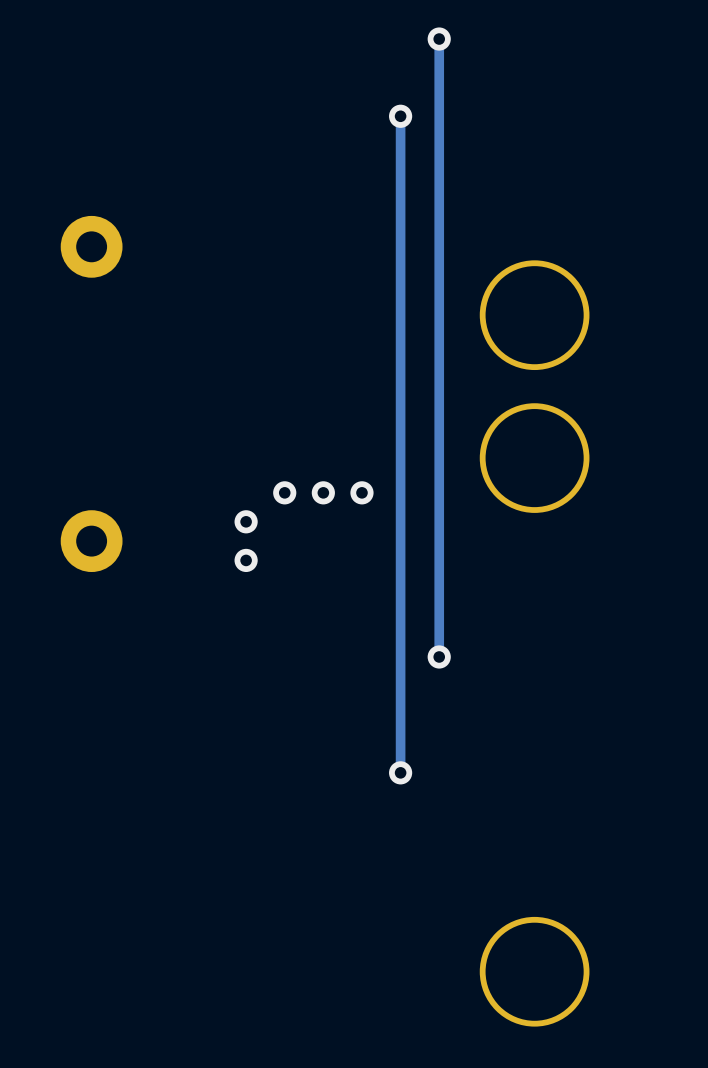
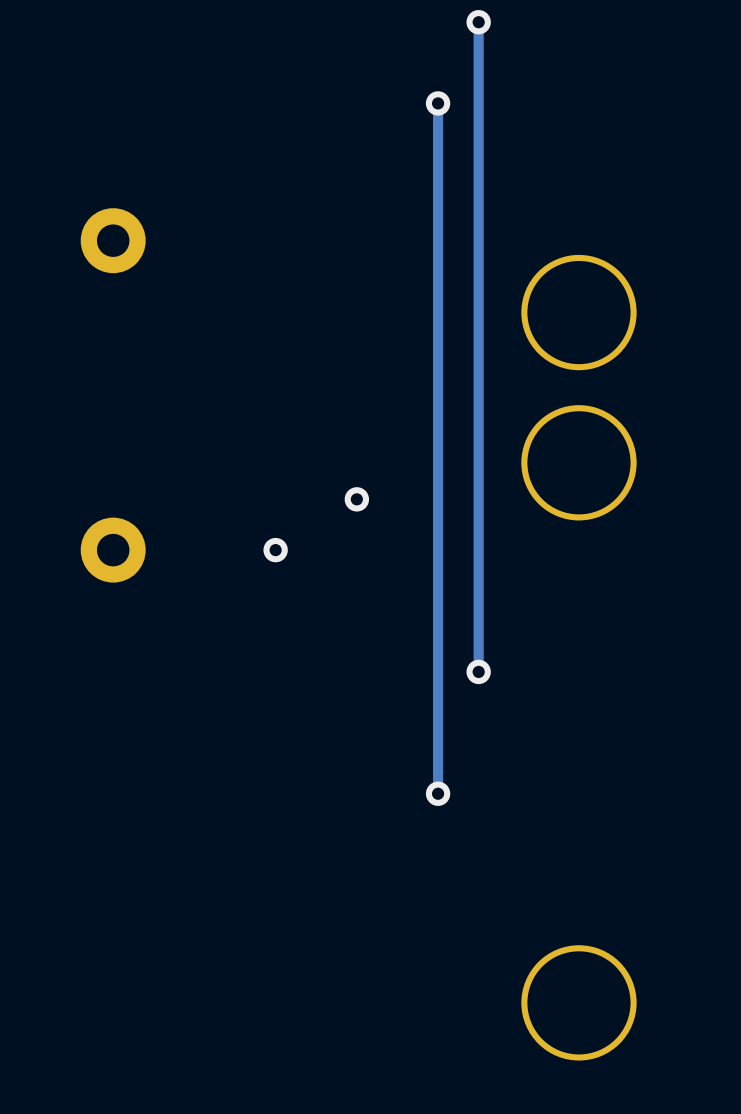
via: (284, 492) -> none
via: (361, 492) -> none
via: (246, 521) -> none
via: none -> (275, 550)
via: (246, 560) -> none

